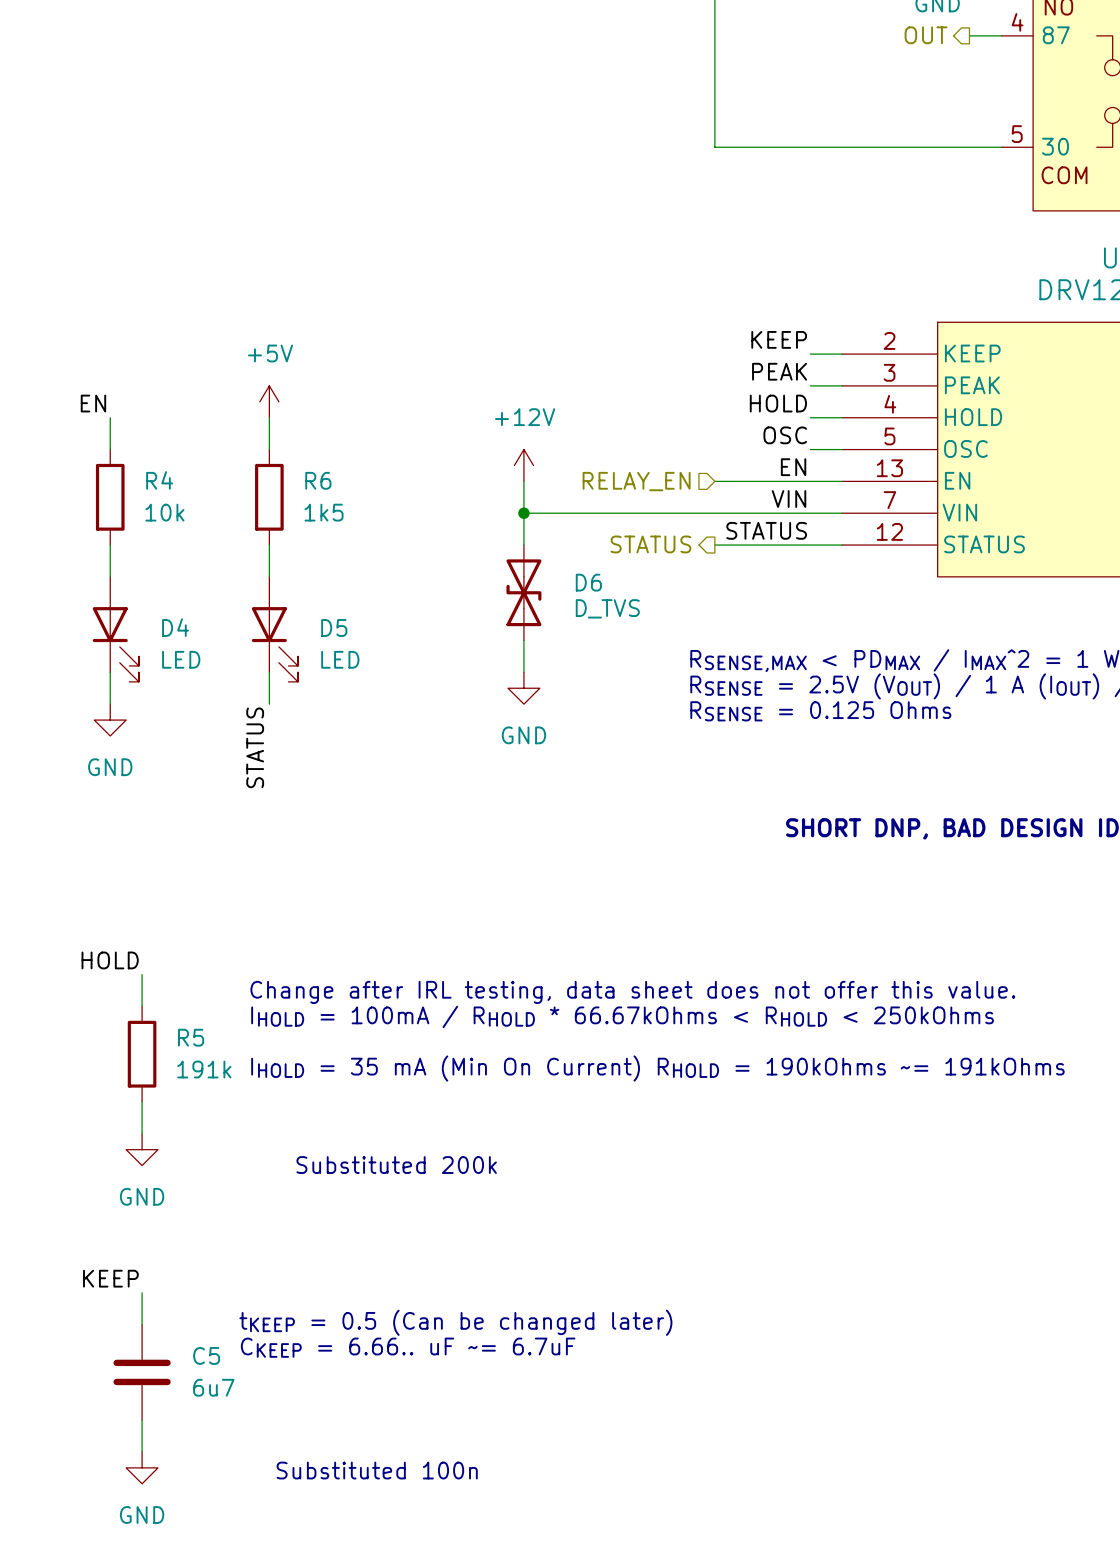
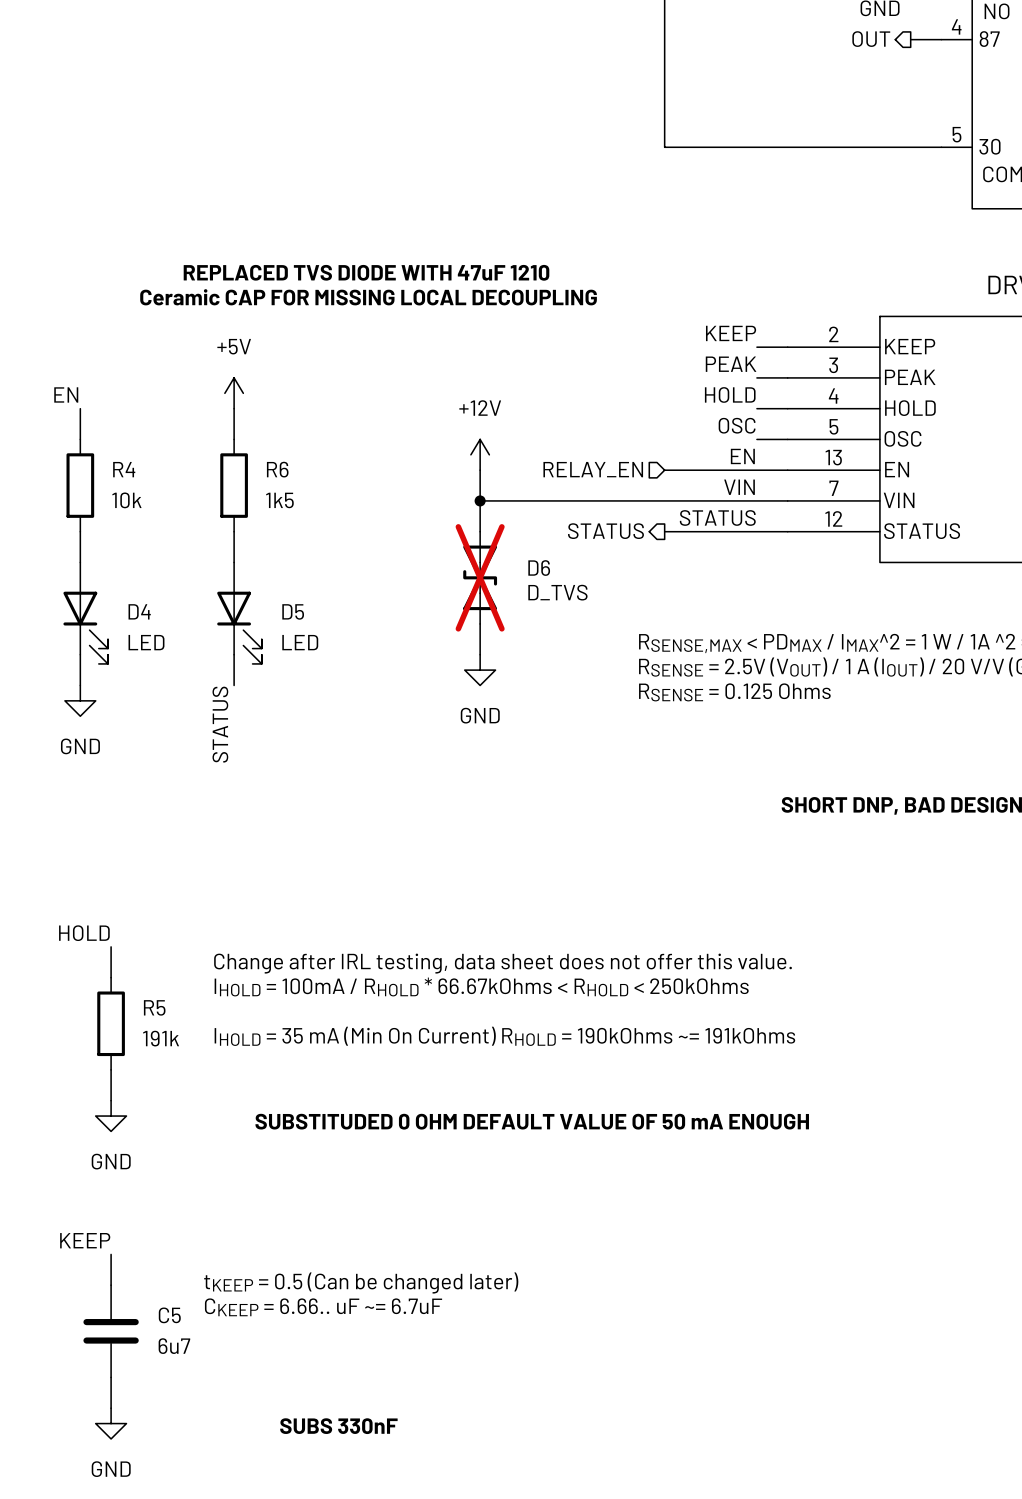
text: none -> REPLACED TVS DIODE WITH 47uF 1210 (366, 272)
text: none -> Ceramic CAP FOR MISSING LOCAL DECOUPLING (368, 297)
D6 do-not-place cross: none -> (480, 577)
text: none -> SUBSTITUDED 0 OHM DEFAULT VALUE OF 50 mA ENOUGH (532, 1121)
text: Substituted 200k (396, 1165) -> none
text: Substituted 100n (377, 1470) -> SUBS 330nF (338, 1426)

